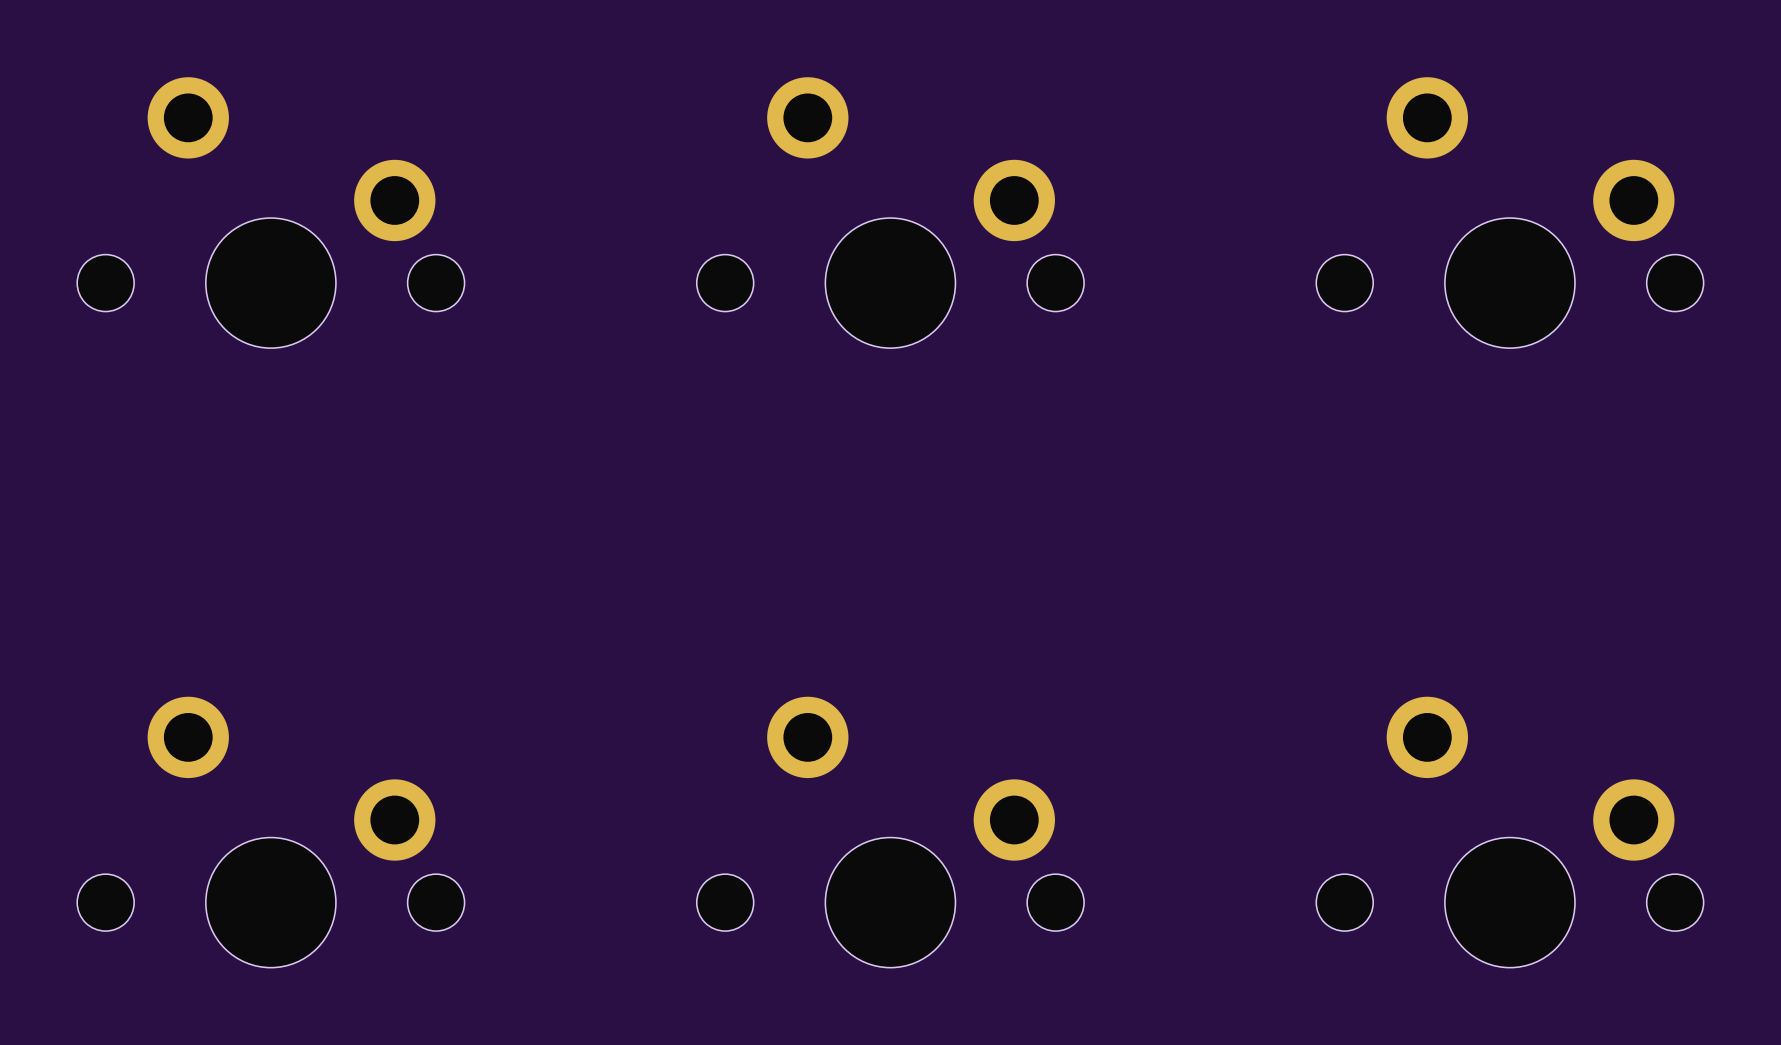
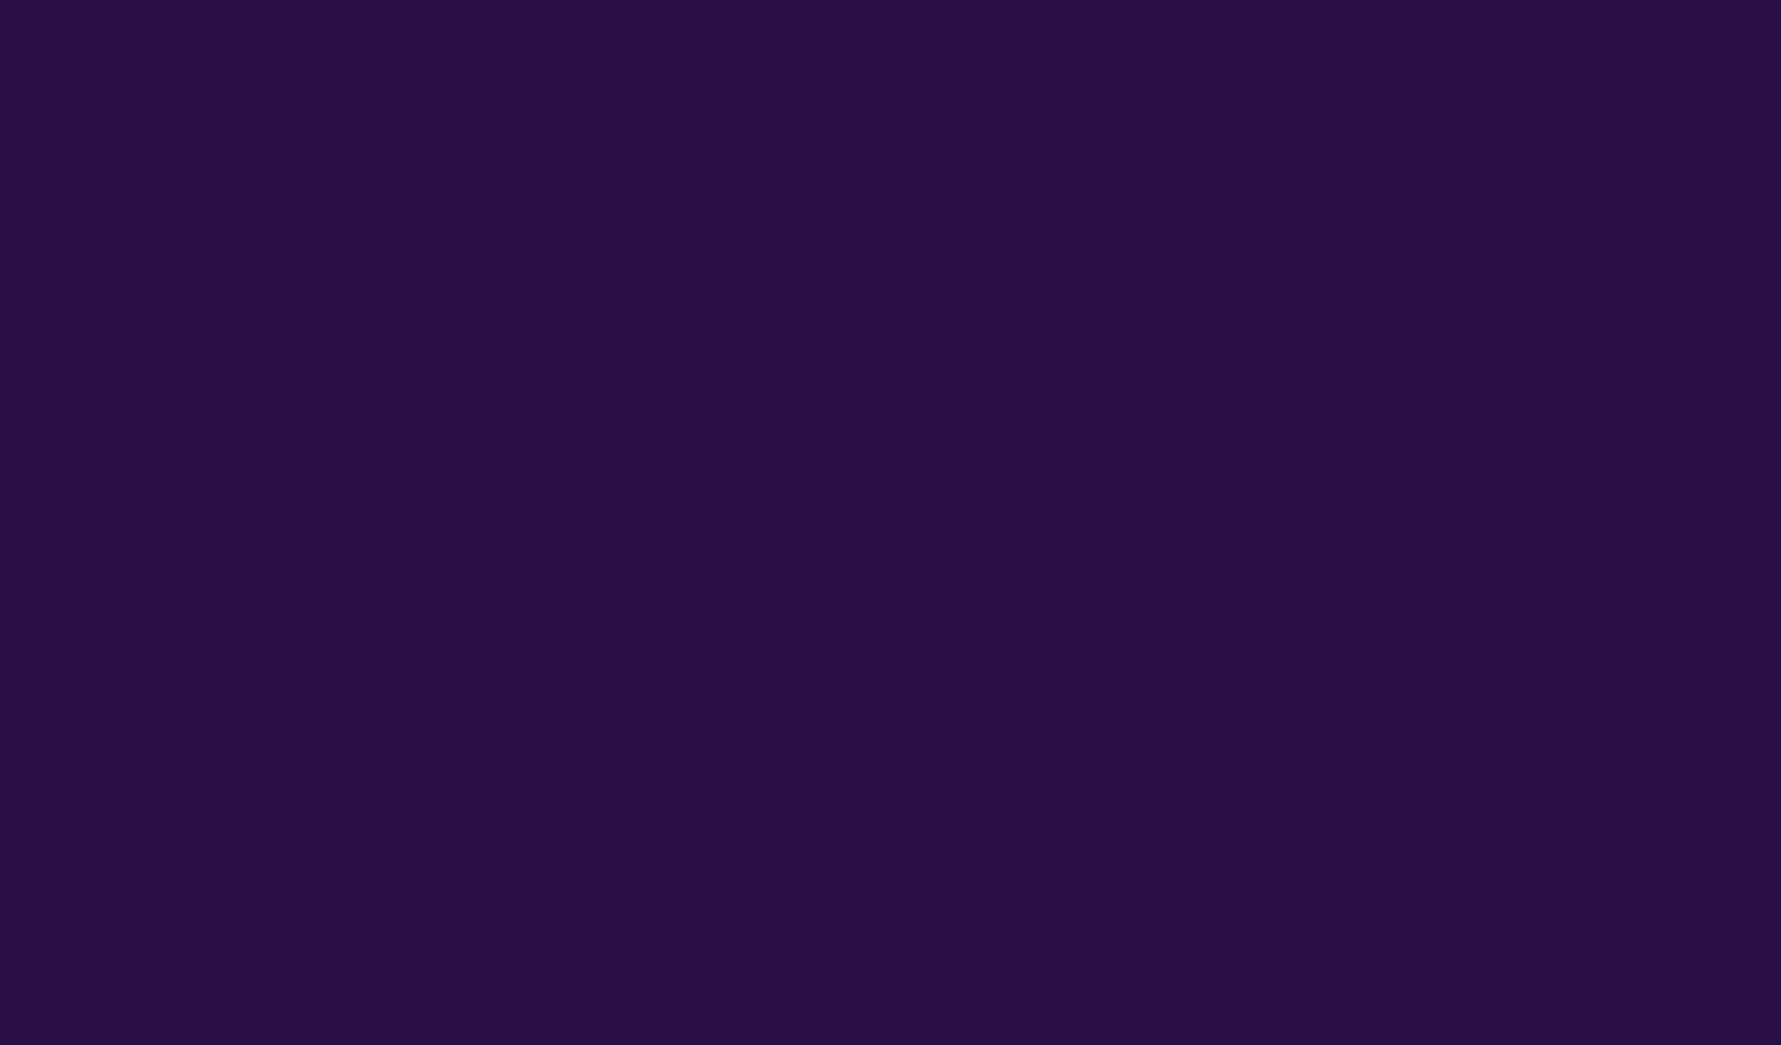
part: (270, 212) -> none
part: (890, 212) -> none
part: (1509, 212) -> none
part: (270, 832) -> none
part: (890, 832) -> none
part: (1509, 832) -> none

